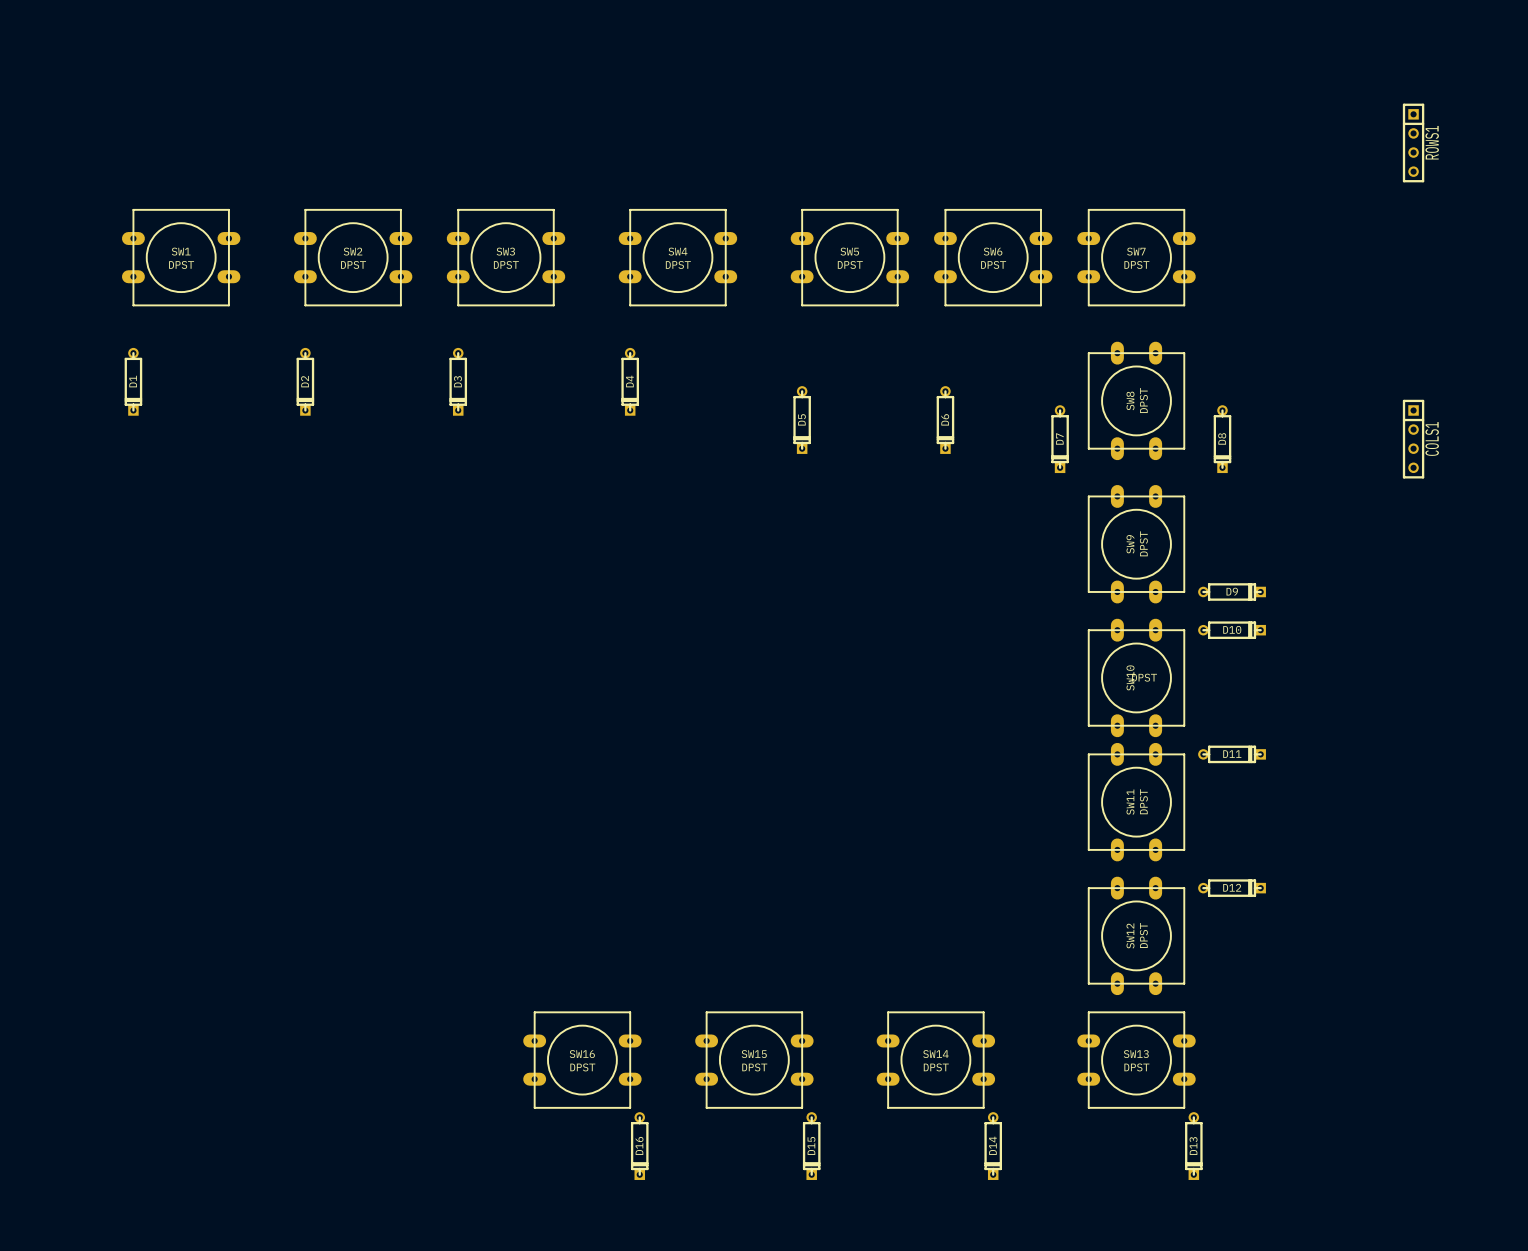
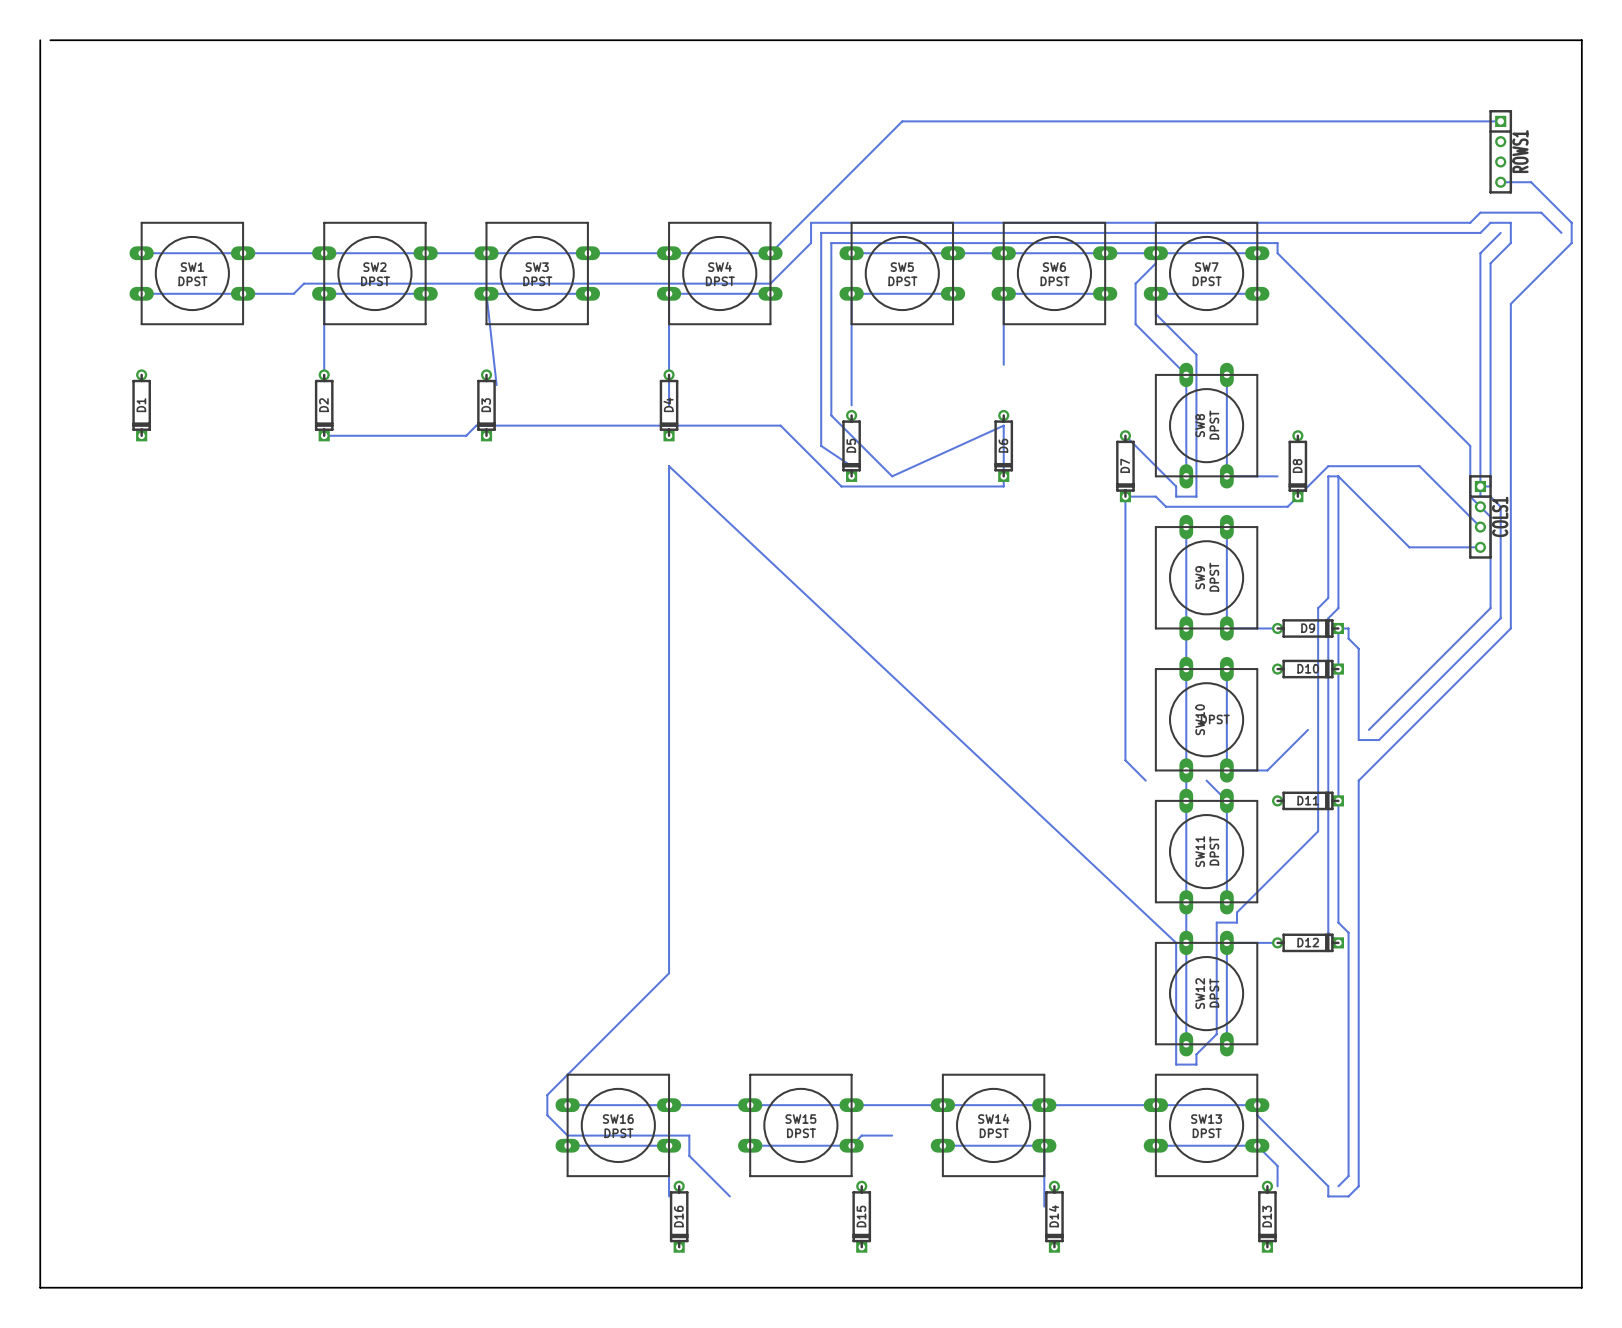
board edge: none -> (40, 40) (40, 1287) (1581, 1287) (1581, 40) (50, 40)
bottom track: none -> (1500, 121) (902, 121) (770, 253) (141, 253)
bottom track: none -> (1500, 182) (1531, 182) (1571, 222) (1571, 243) (1510, 303) (1510, 628) (1358, 780) (1358, 1186) (1348, 1196) (1328, 1196) (1328, 1186) (1257, 1115) (1257, 1105) (567, 1105)
bottom track: none -> (1500, 232) (1480, 253) (1480, 496) (1490, 496) (1500, 506) (1500, 618) (1378, 740) (1358, 740) (1358, 648) (1348, 638) (1348, 628) (1338, 628) (1338, 922) (1348, 932) (1348, 1176) (1338, 1186)
bottom track: none -> (1561, 232) (1541, 212) (1480, 212) (1470, 222) (811, 222) (811, 243) (770, 283) (303, 283) (293, 293) (141, 293)
bottom track: none -> (851, 253) (1257, 253)
bottom track: none -> (1155, 253) (1155, 263) (1135, 283) (1135, 324) (1186, 374) (1186, 476)
bottom track: none -> (425, 293) (324, 293) (324, 374)
bottom track: none -> (587, 293) (486, 293) (496, 385)
bottom track: none -> (770, 293) (669, 293) (669, 405)
bottom track: none -> (953, 293) (851, 293) (851, 405)
bottom track: none -> (1105, 293) (1003, 293) (1003, 364)
bottom track: none -> (1257, 293) (1155, 293) (1155, 314) (1196, 354) (1196, 496) (1176, 496) (1176, 486) (1125, 435)
bottom track: none -> (1226, 374) (1226, 476) (1277, 476)
bottom track: none -> (324, 435) (466, 435) (476, 425) (780, 425) (841, 486) (1003, 486) (1003, 425) (892, 476) (831, 415) (831, 243) (1277, 243) (1277, 253) (1470, 445) (1470, 496) (1490, 516) (1490, 608) (1368, 729)
bottom track: none -> (851, 466) (821, 445) (821, 232) (1480, 232) (1490, 222) (1510, 222) (1510, 243) (1490, 263) (1490, 486) (1480, 486)
COLS1 position: (1413, 439) -> (1480, 516)
bottom track: none -> (1338, 476) (1338, 608) (1328, 618) (1328, 932) (1338, 942)
bottom track: none -> (1338, 476) (1328, 476) (1328, 598) (1318, 608) (1318, 831) (1237, 912) (1237, 922) (1216, 922) (1216, 1034) (1196, 1054) (1196, 1064) (1176, 1064) (1176, 942) (669, 466) (669, 973) (547, 1095) (547, 1115) (567, 1135) (689, 1135) (689, 1155) (729, 1196)
bottom track: none -> (1338, 476) (1409, 547) (1480, 547)
bottom track: none -> (1186, 527) (1186, 1044)
bottom track: none -> (1226, 527) (1226, 628) (1277, 628)
bottom track: none -> (1480, 527) (1419, 466) (1328, 466) (1287, 506) (1166, 506) (1155, 496) (1125, 496) (1125, 760) (1145, 780)
bottom track: none -> (1226, 669) (1226, 770) (1267, 770) (1308, 729)
bottom track: none -> (1206, 780) (1226, 800) (1226, 902)
bottom track: none -> (1277, 942) (1226, 942) (1226, 1044)
bottom track: none -> (892, 1135) (861, 1135) (851, 1145) (750, 1145)
bottom track: none -> (567, 1145) (669, 1145) (669, 1196)
bottom track: none -> (942, 1145) (1044, 1145) (1044, 1206)
bottom track: none -> (1155, 1145) (1257, 1145) (1277, 1166) (1277, 1186)

